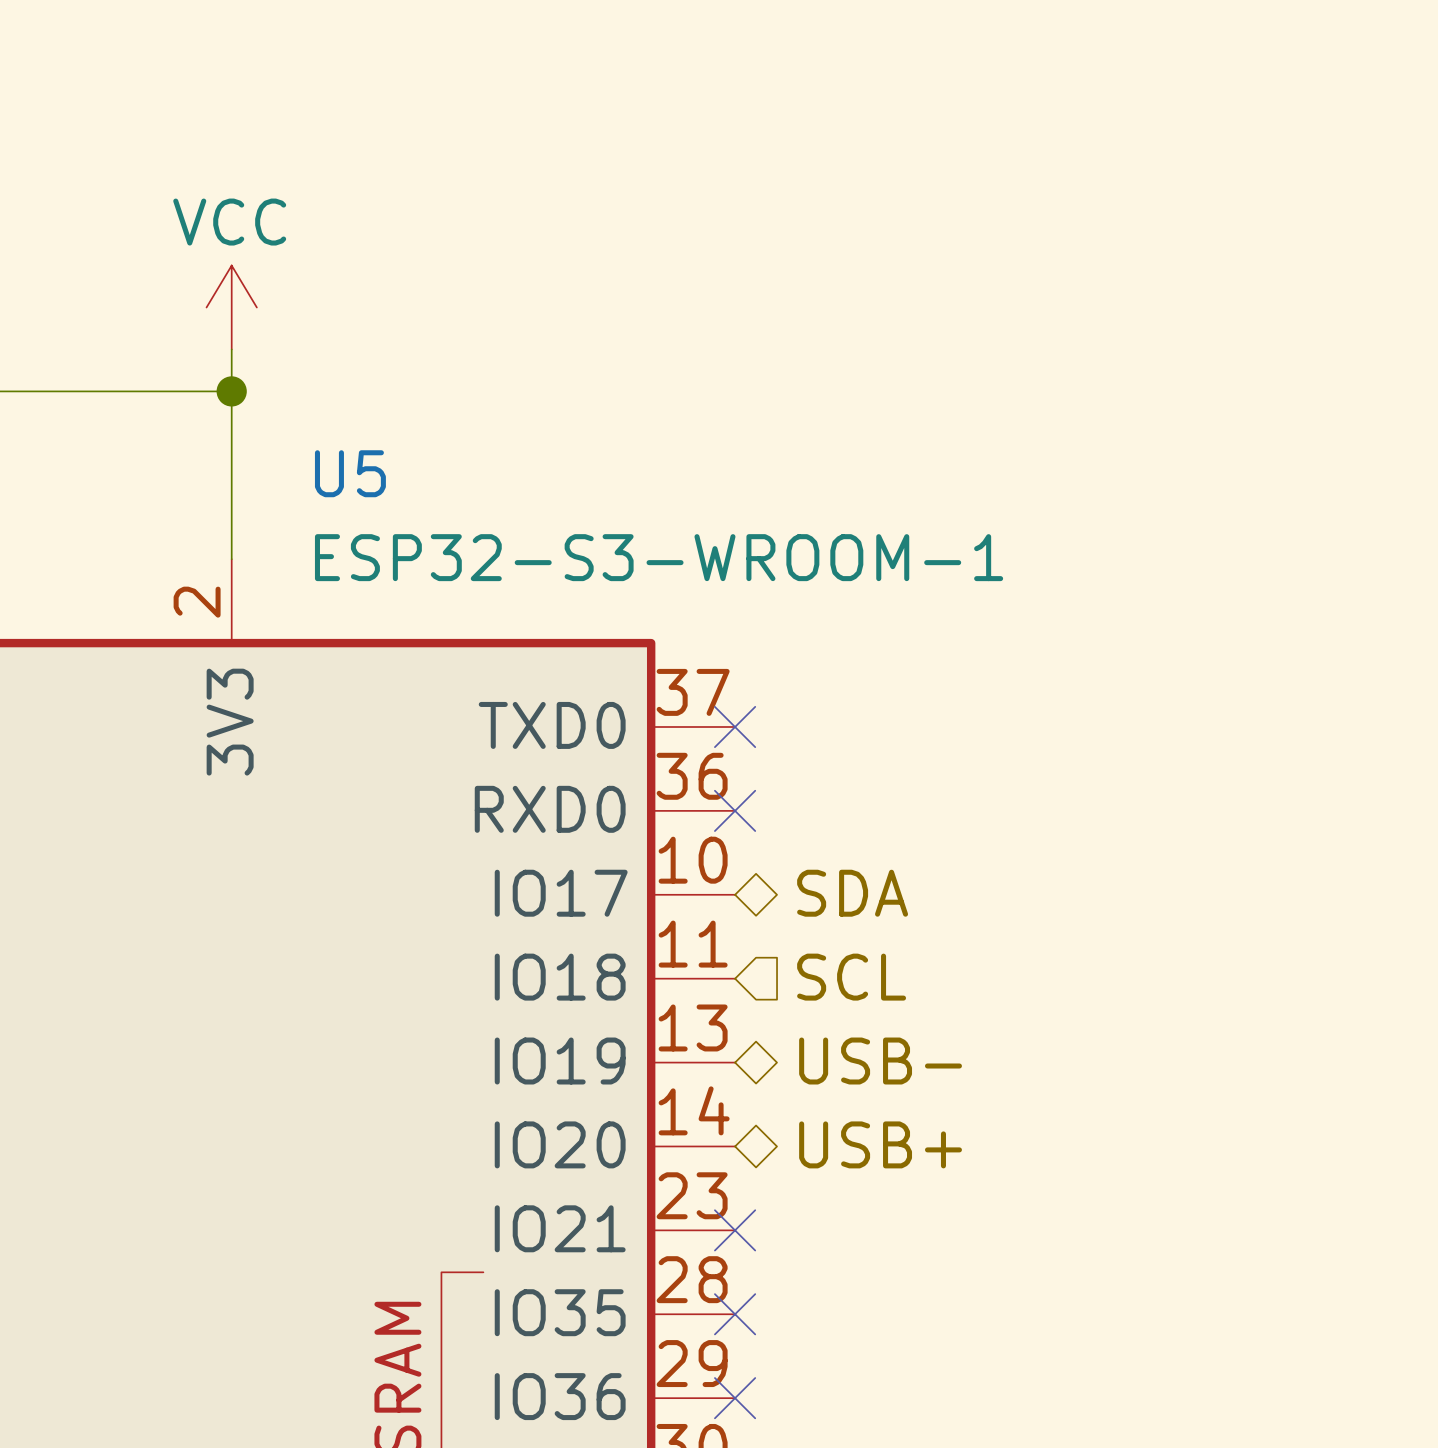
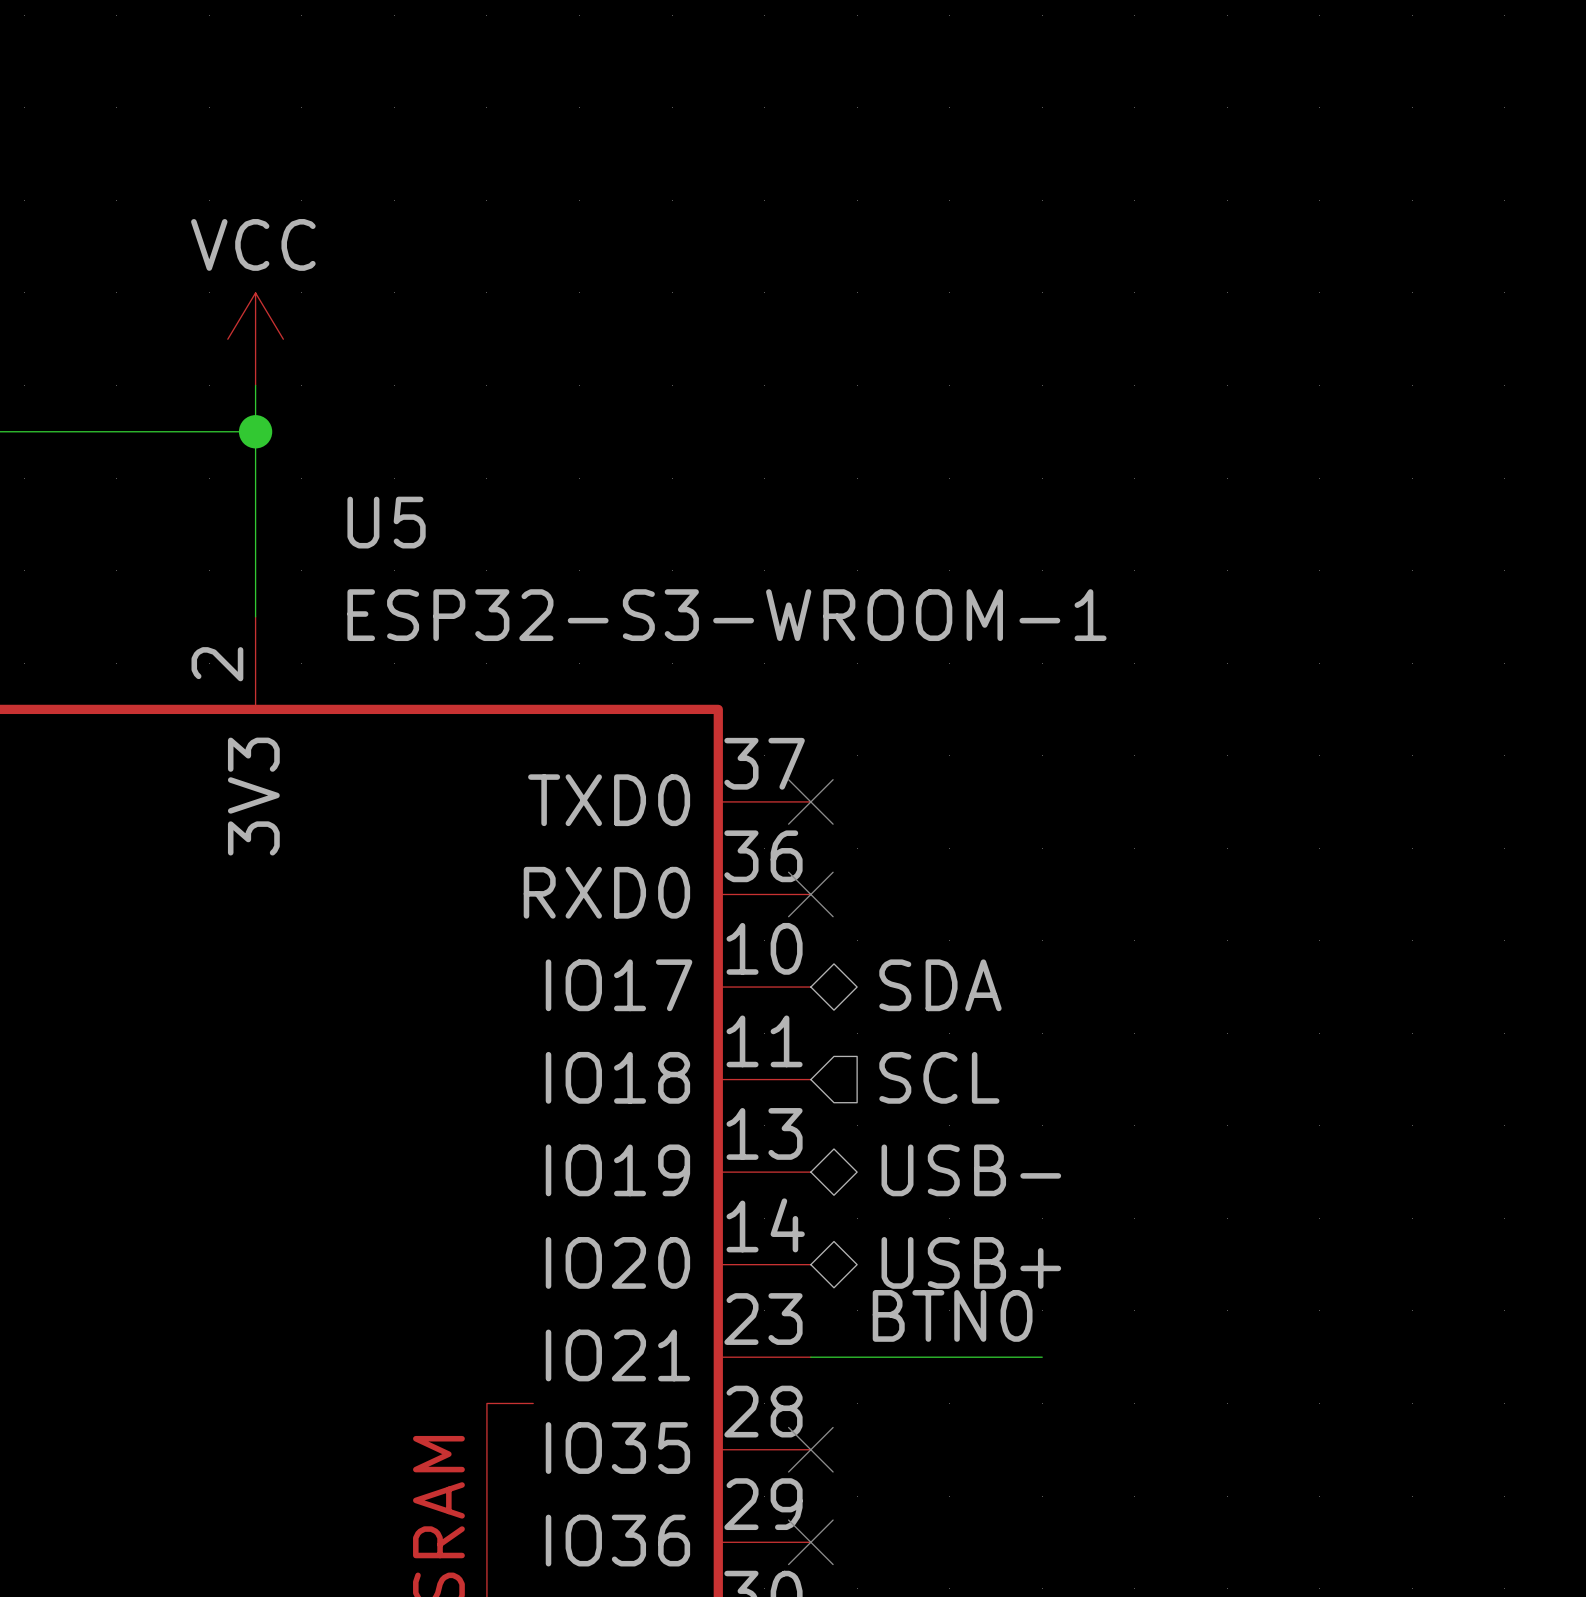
label: none -> BTN0 (952, 1315)
wire: none -> (810, 1357) (1042, 1357)
no-connect mark: (735, 1230) -> none

